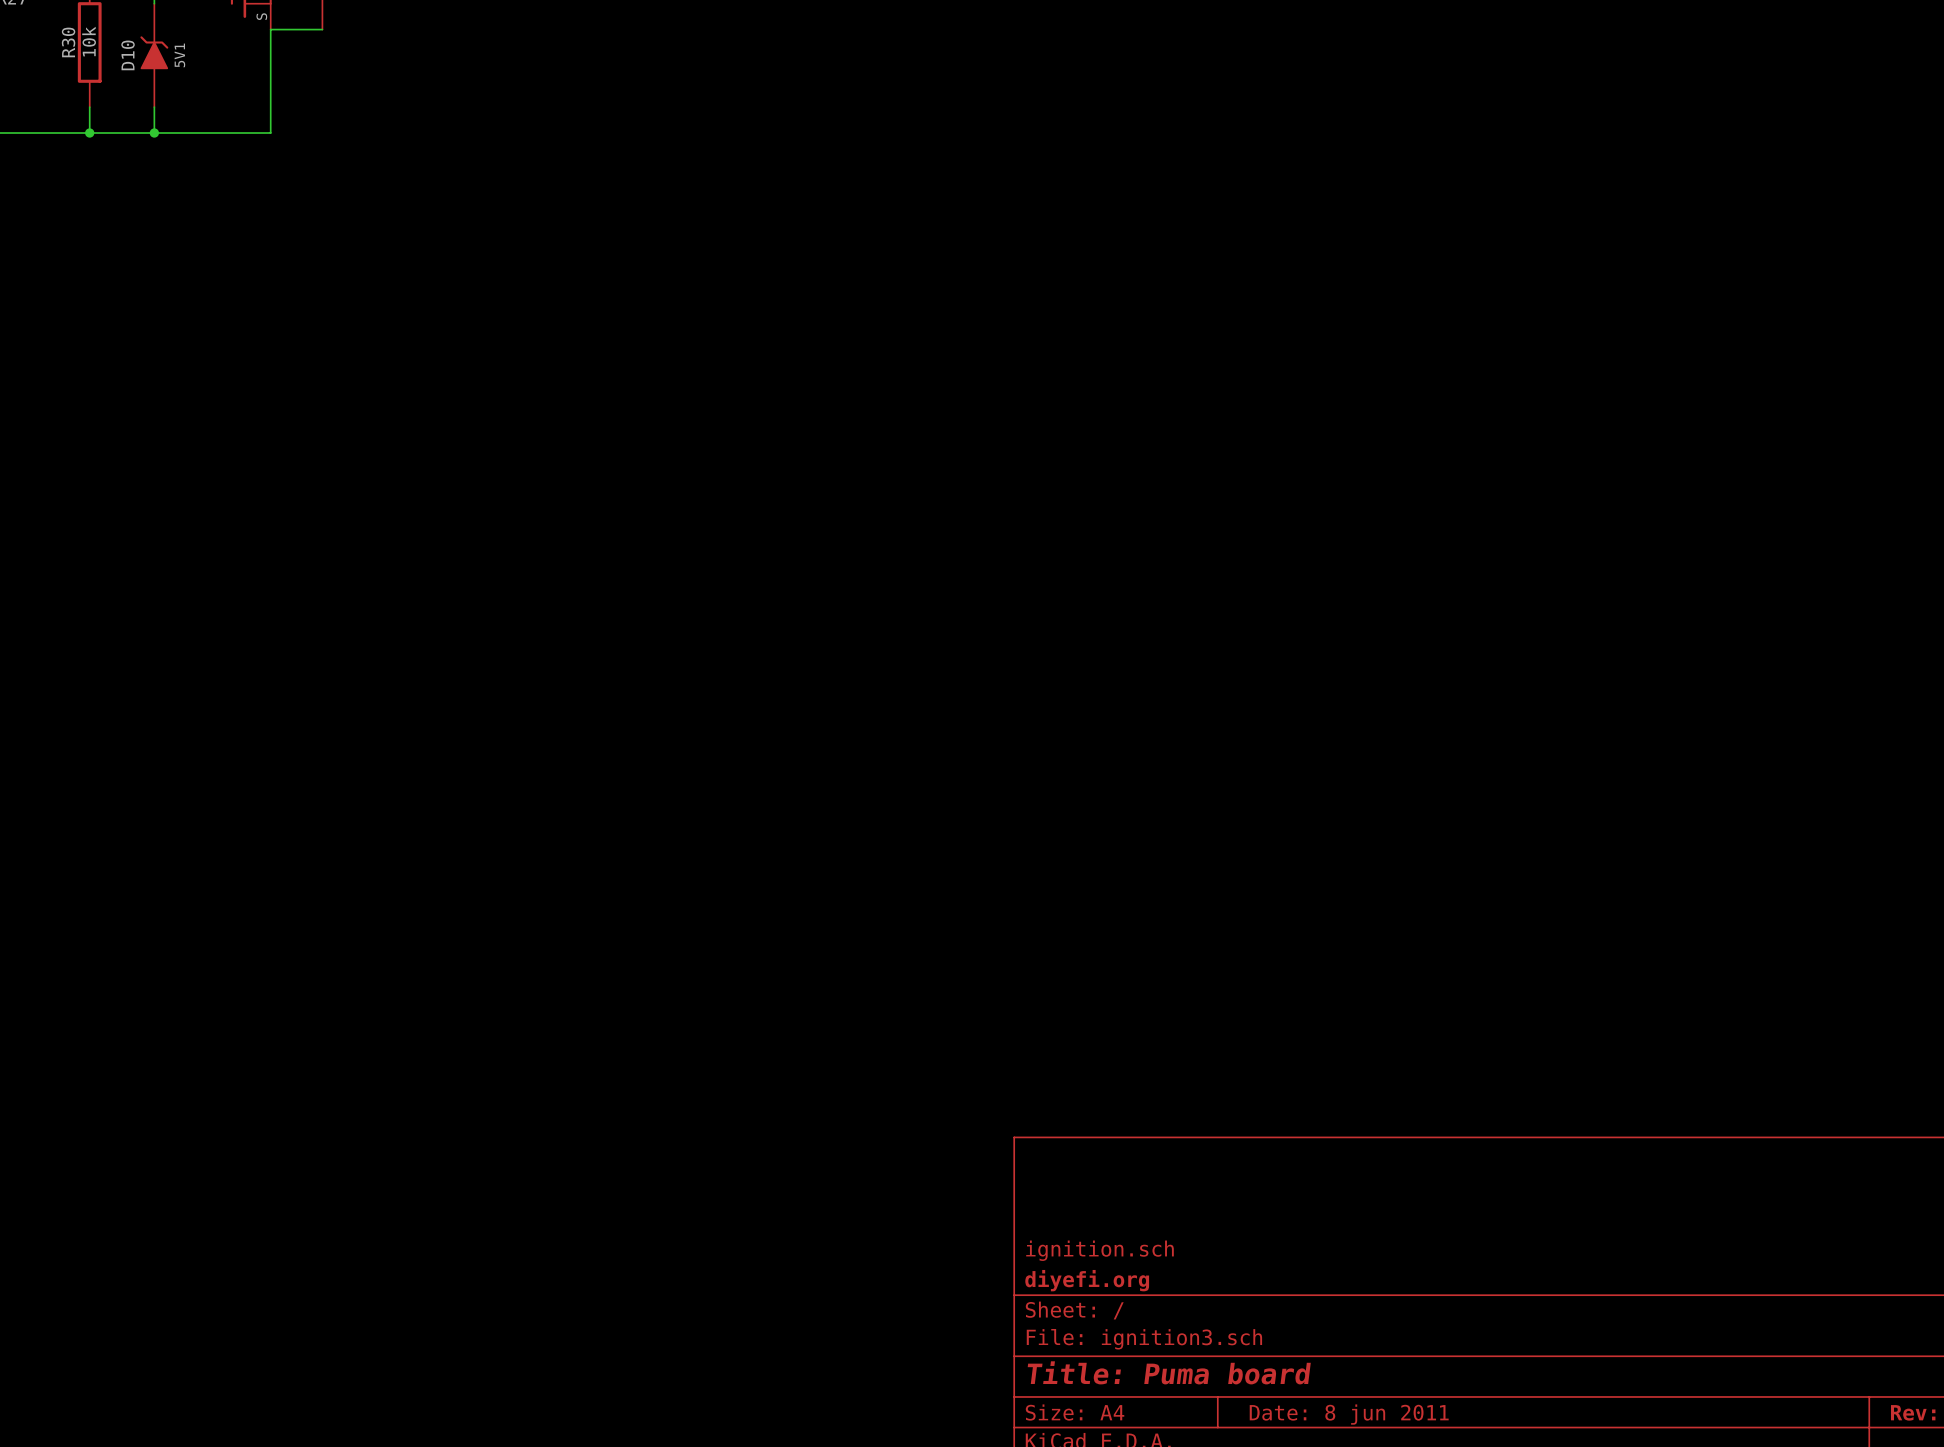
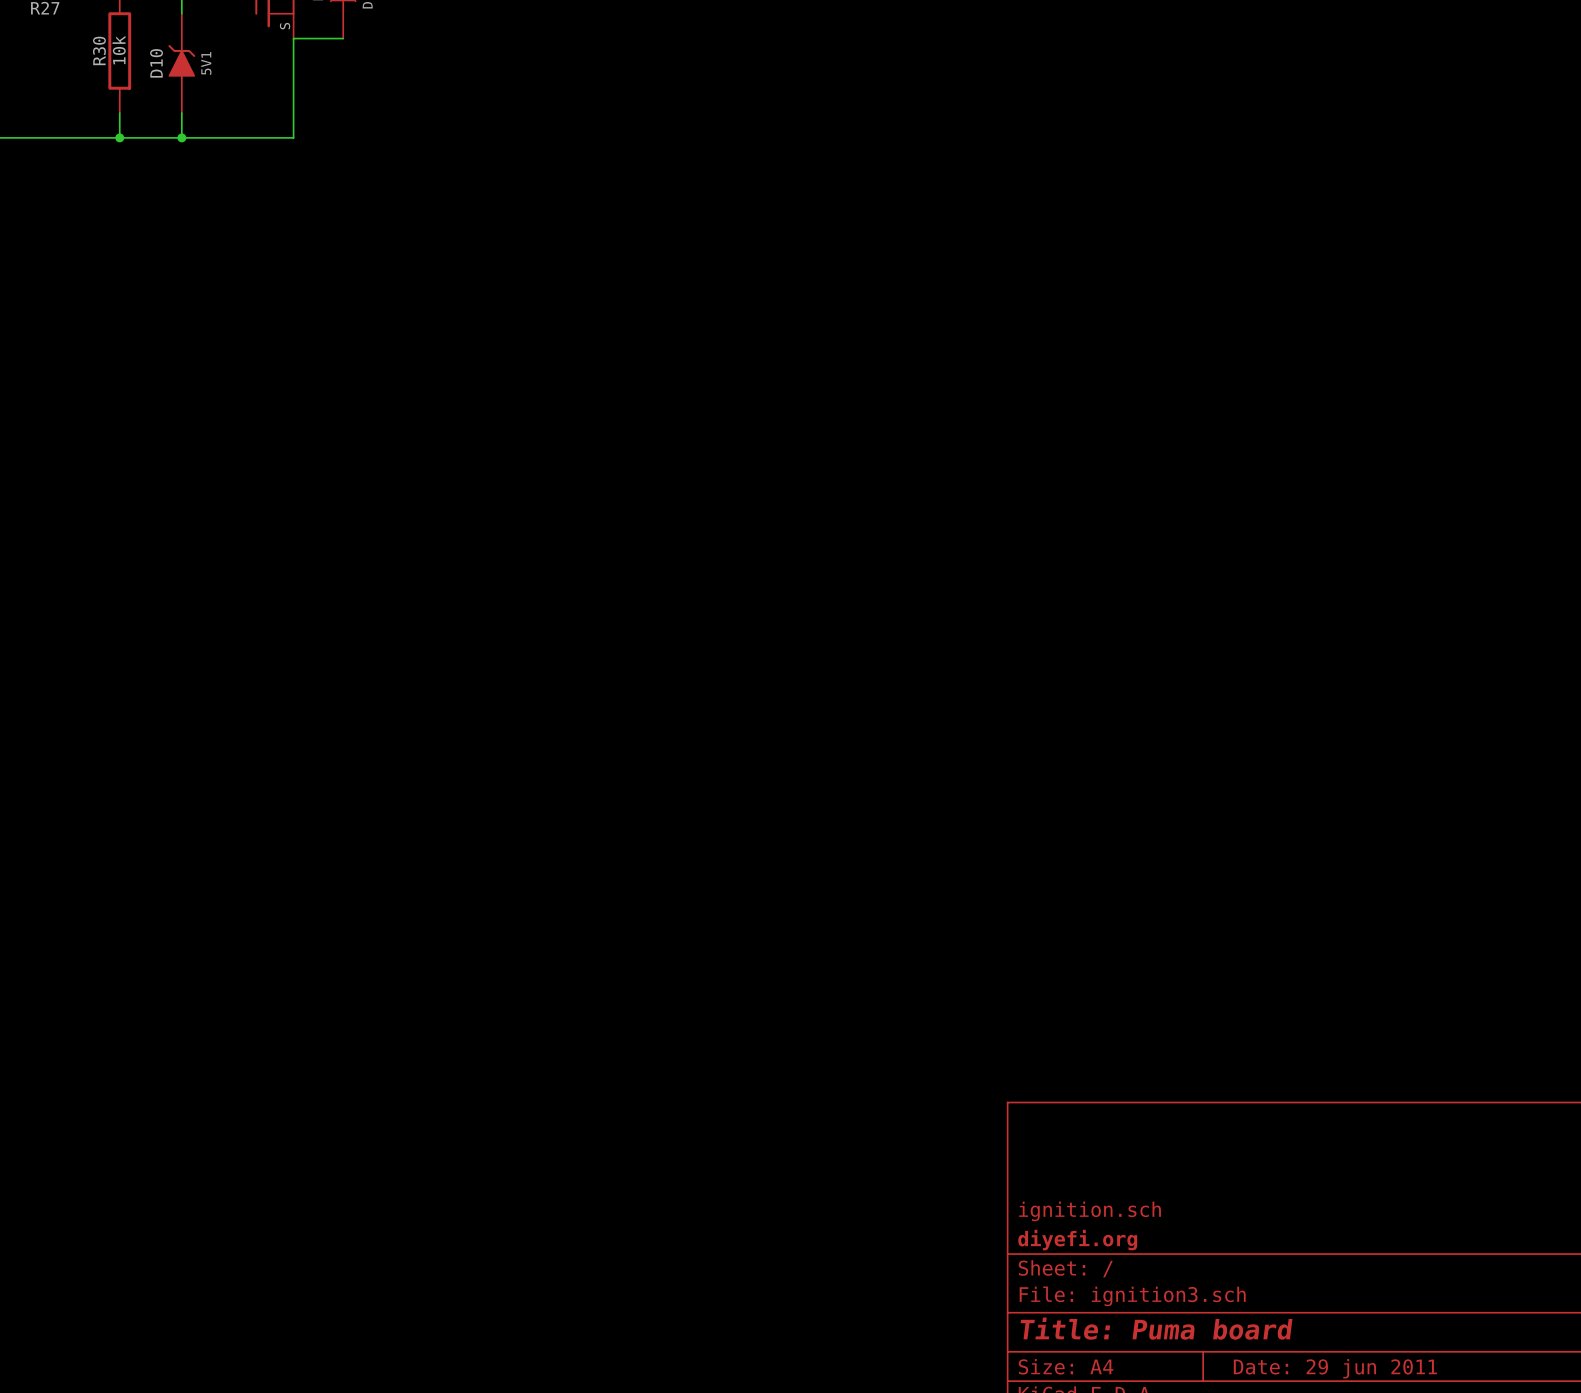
title block: Date: 8 jun 2011 (1349, 1414) -> Date: 29 jun 2011 (1335, 1368)

